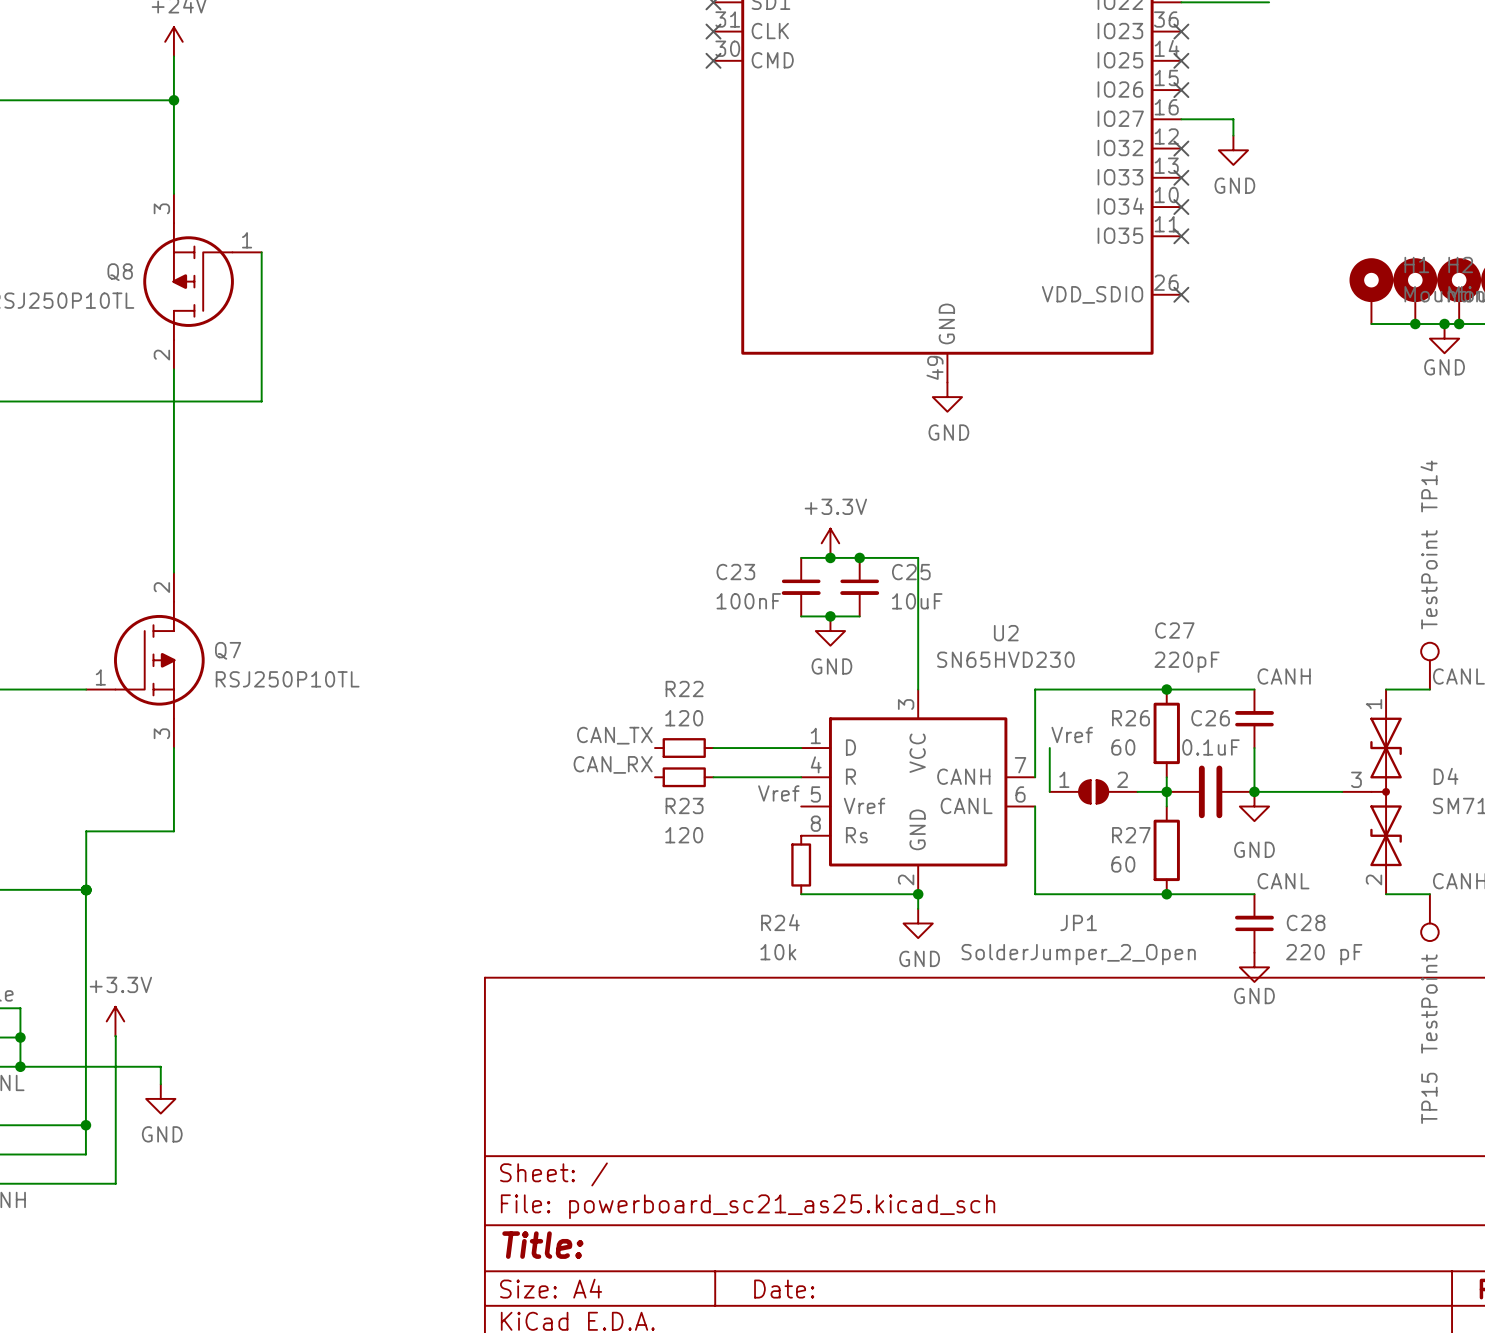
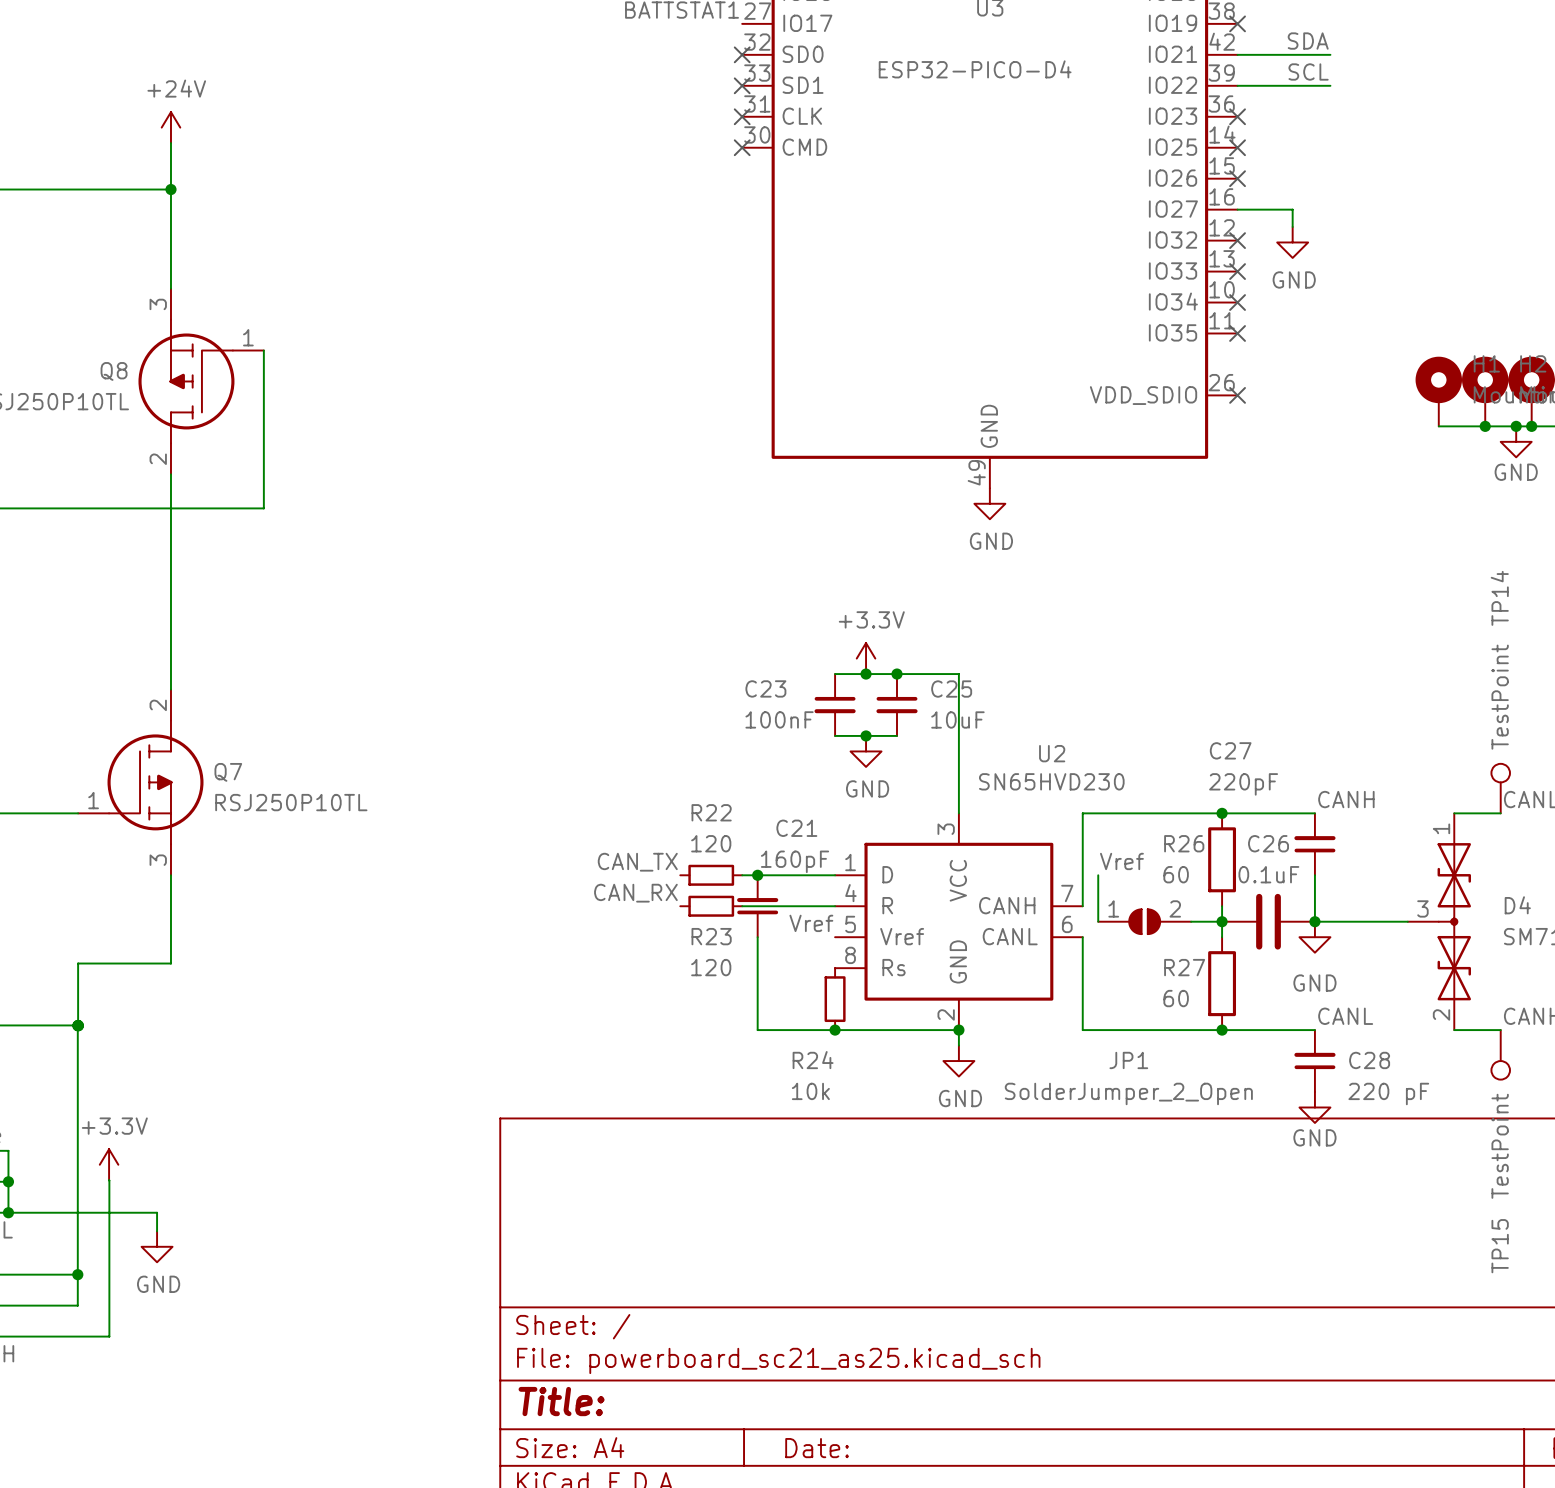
junction: none -> (757, 875)
C21: none -> 160pF (757, 906)
wire: none -> (757, 937) (757, 1030) (835, 1030)
junction: none -> (835, 1030)

